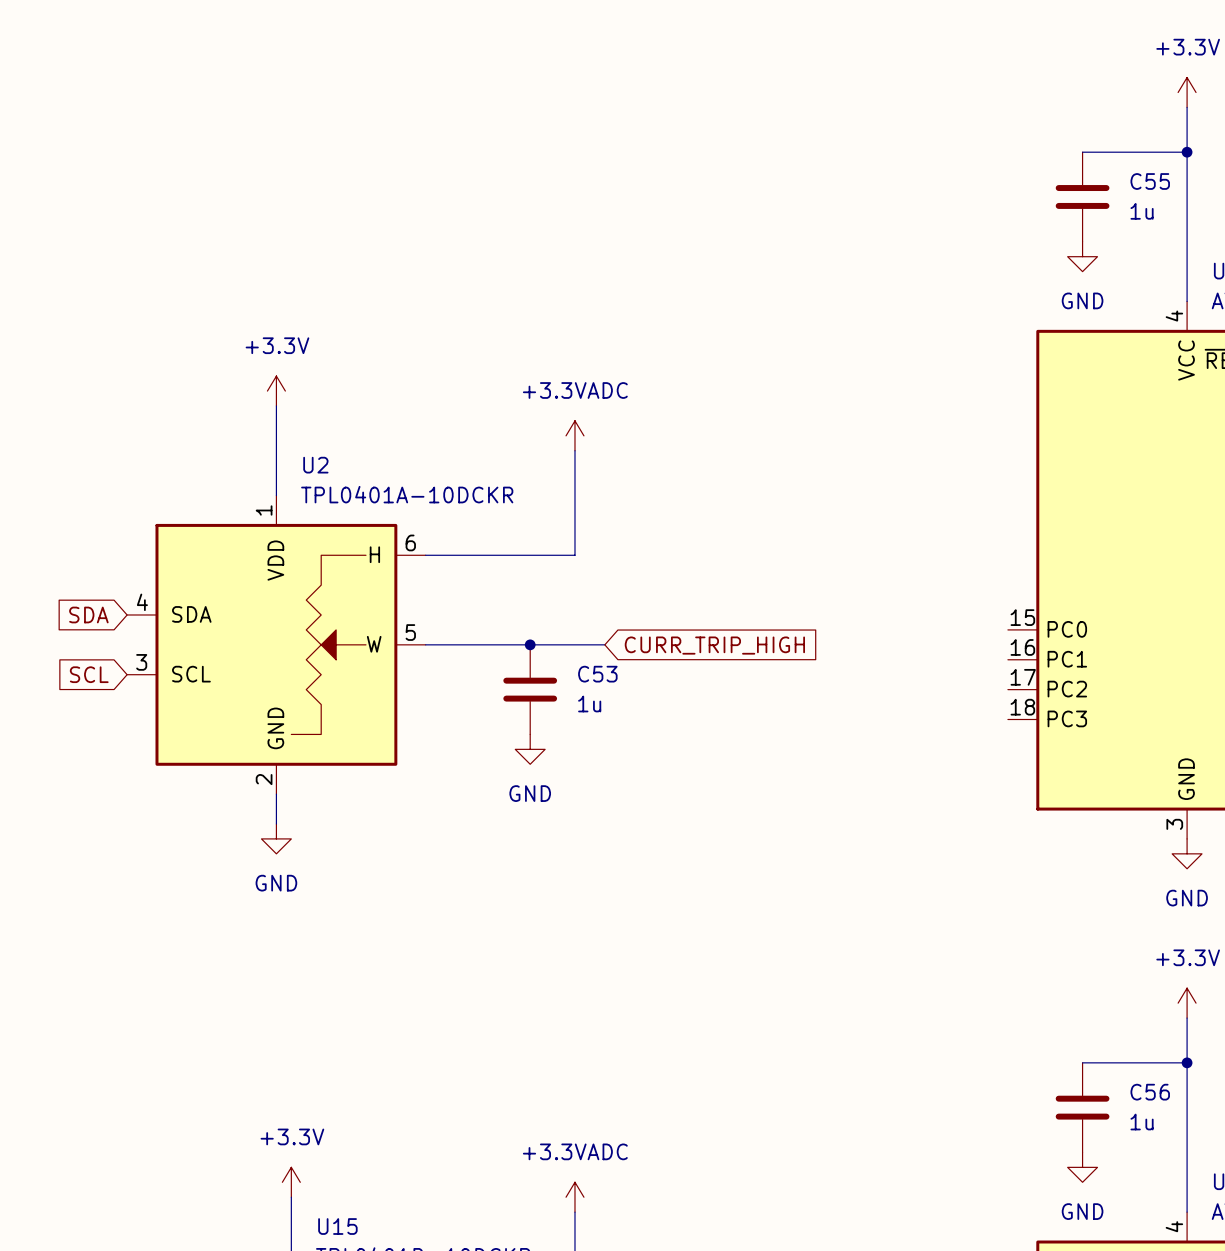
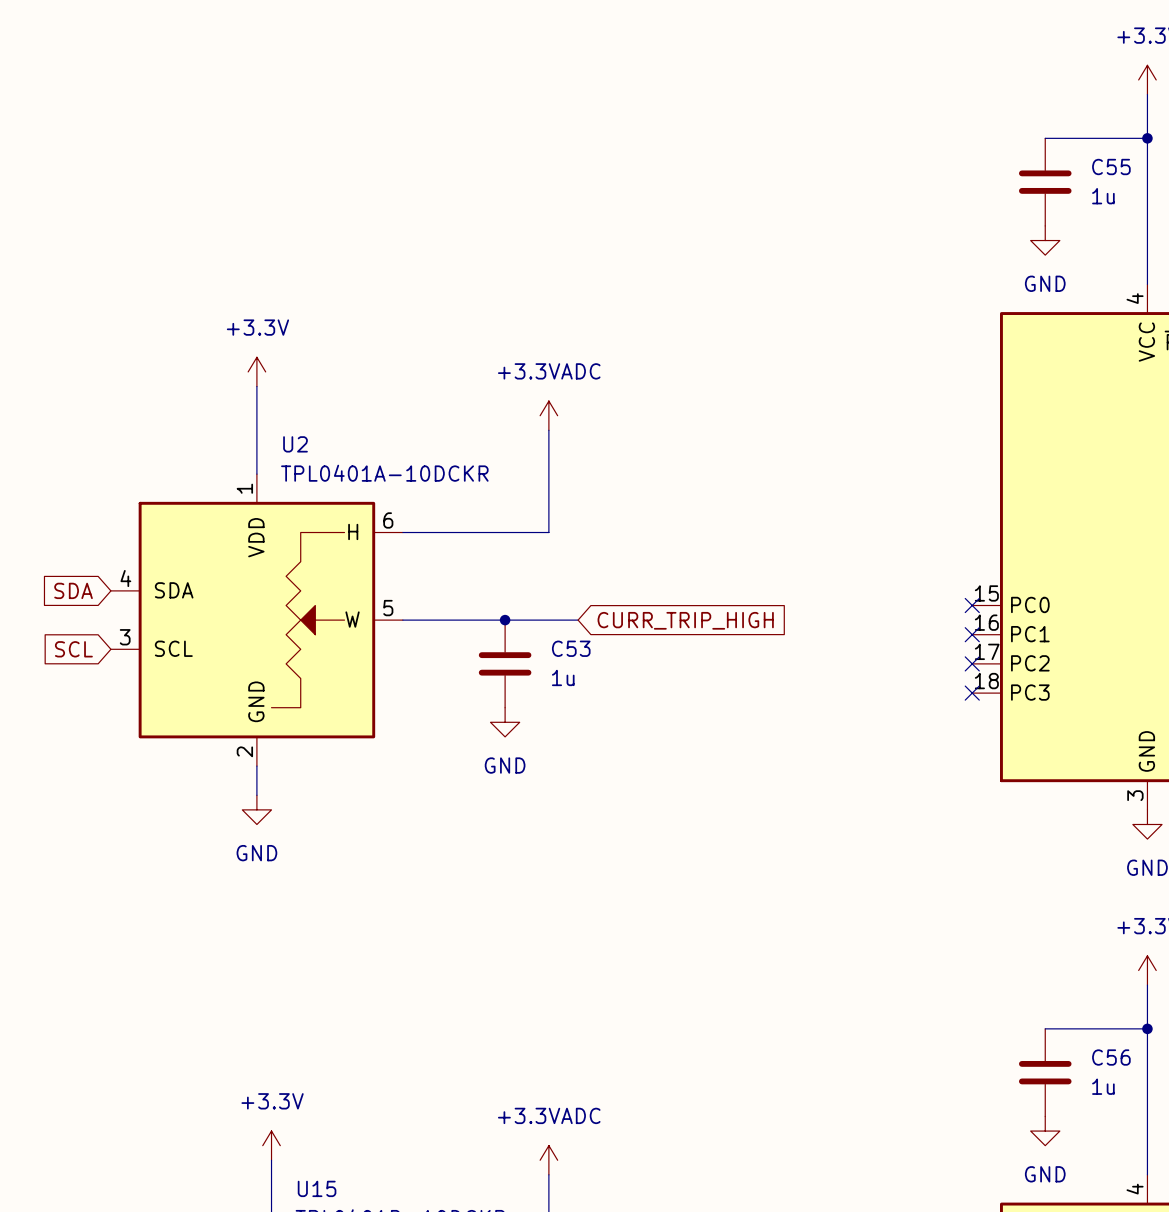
no-connect mark: none -> (972, 605)
no-connect mark: none -> (972, 634)
no-connect mark: none -> (972, 663)
no-connect mark: none -> (972, 693)

